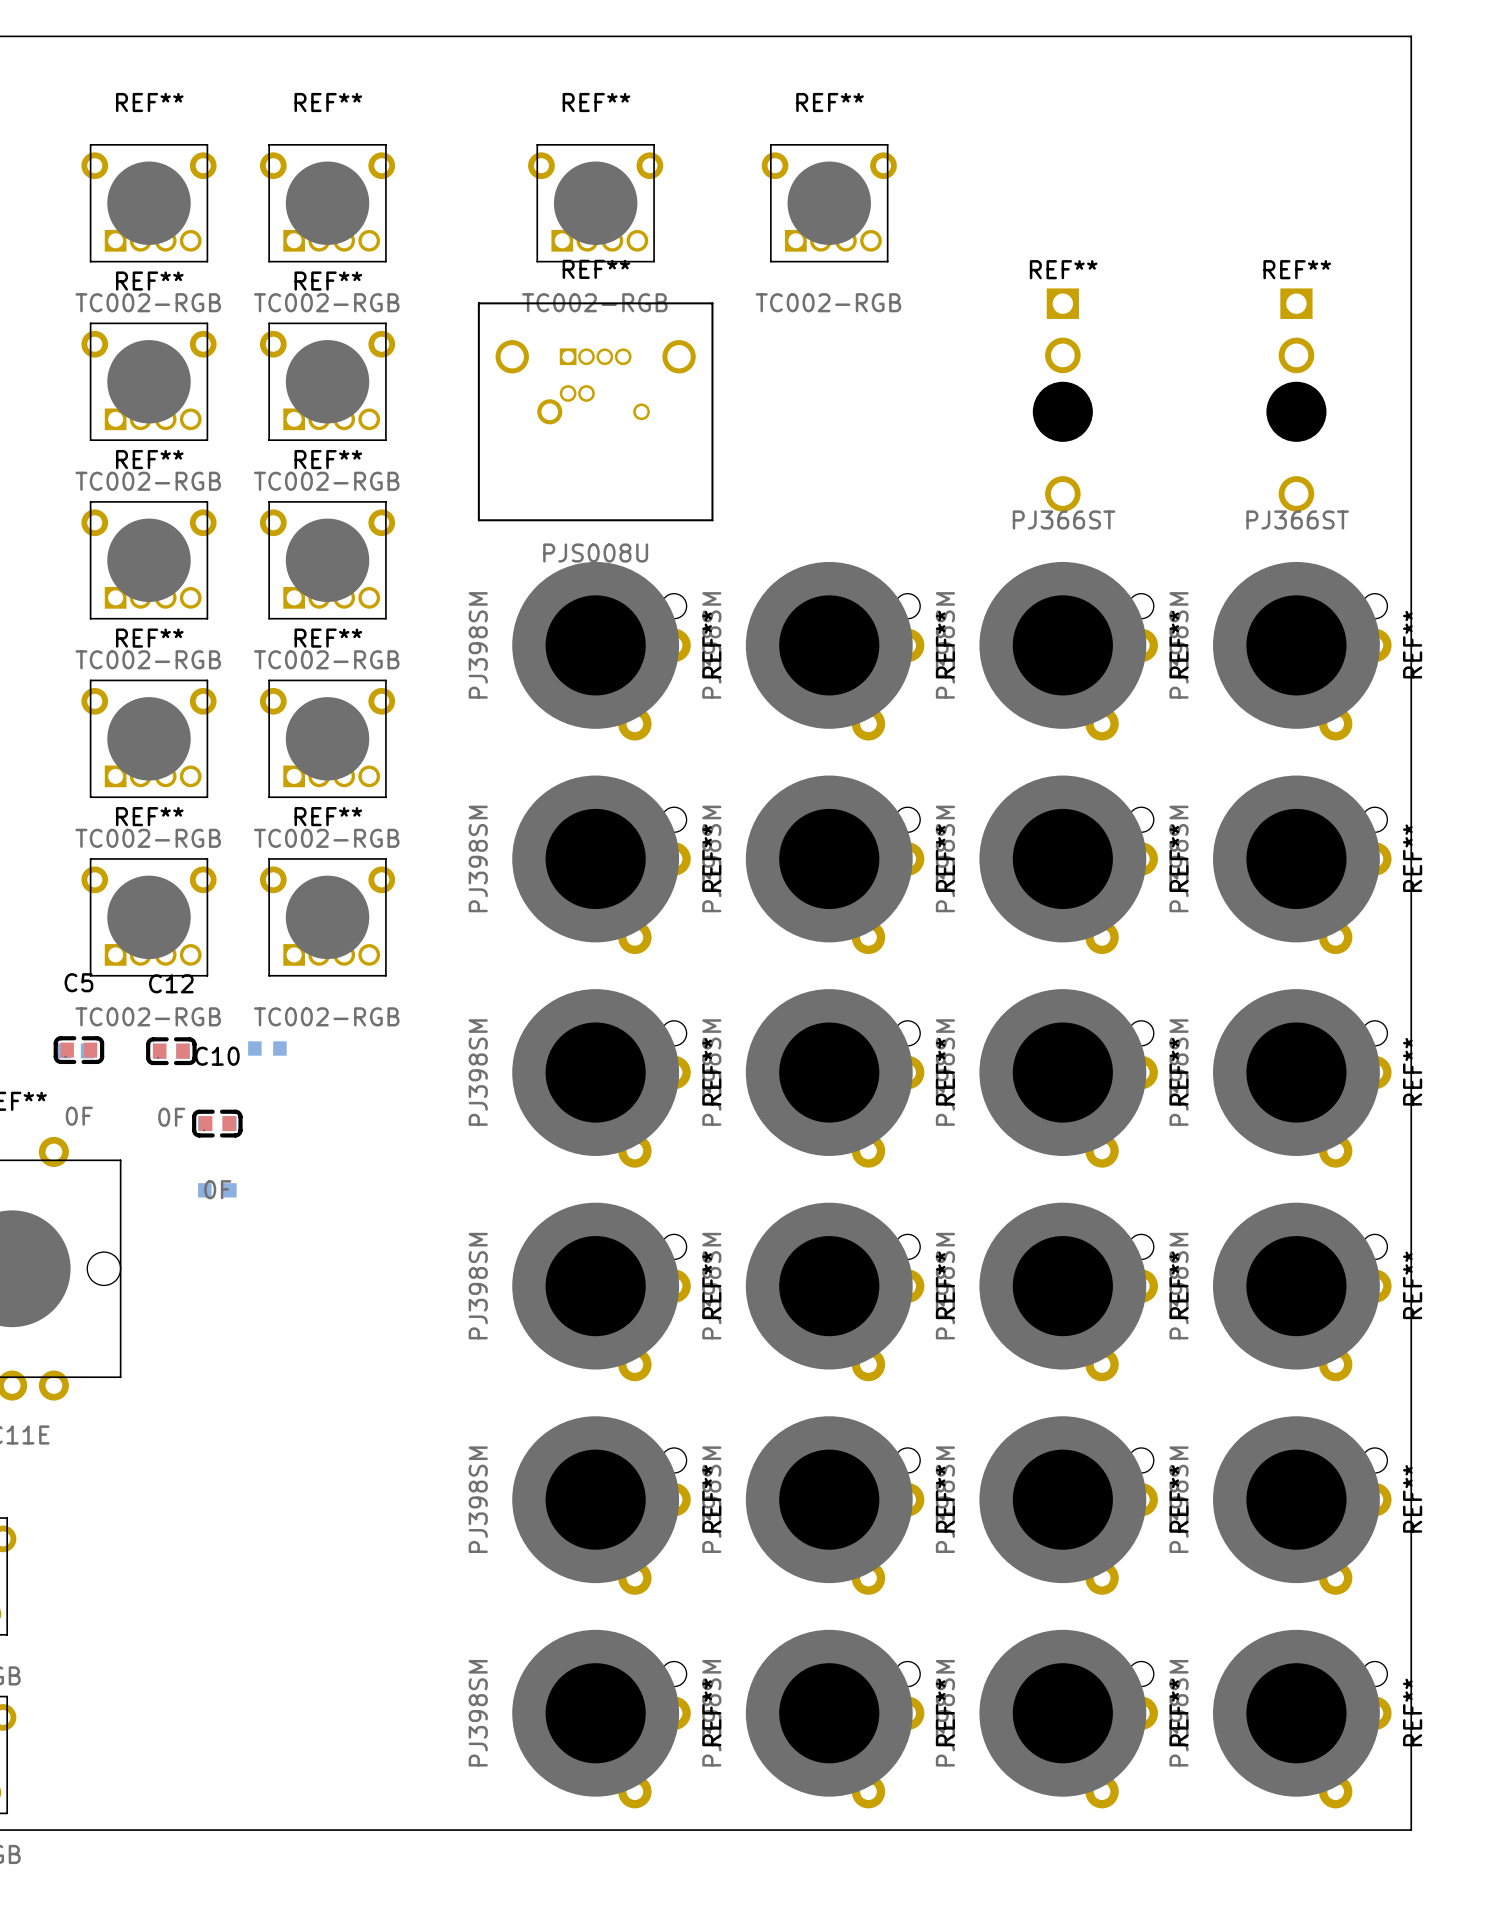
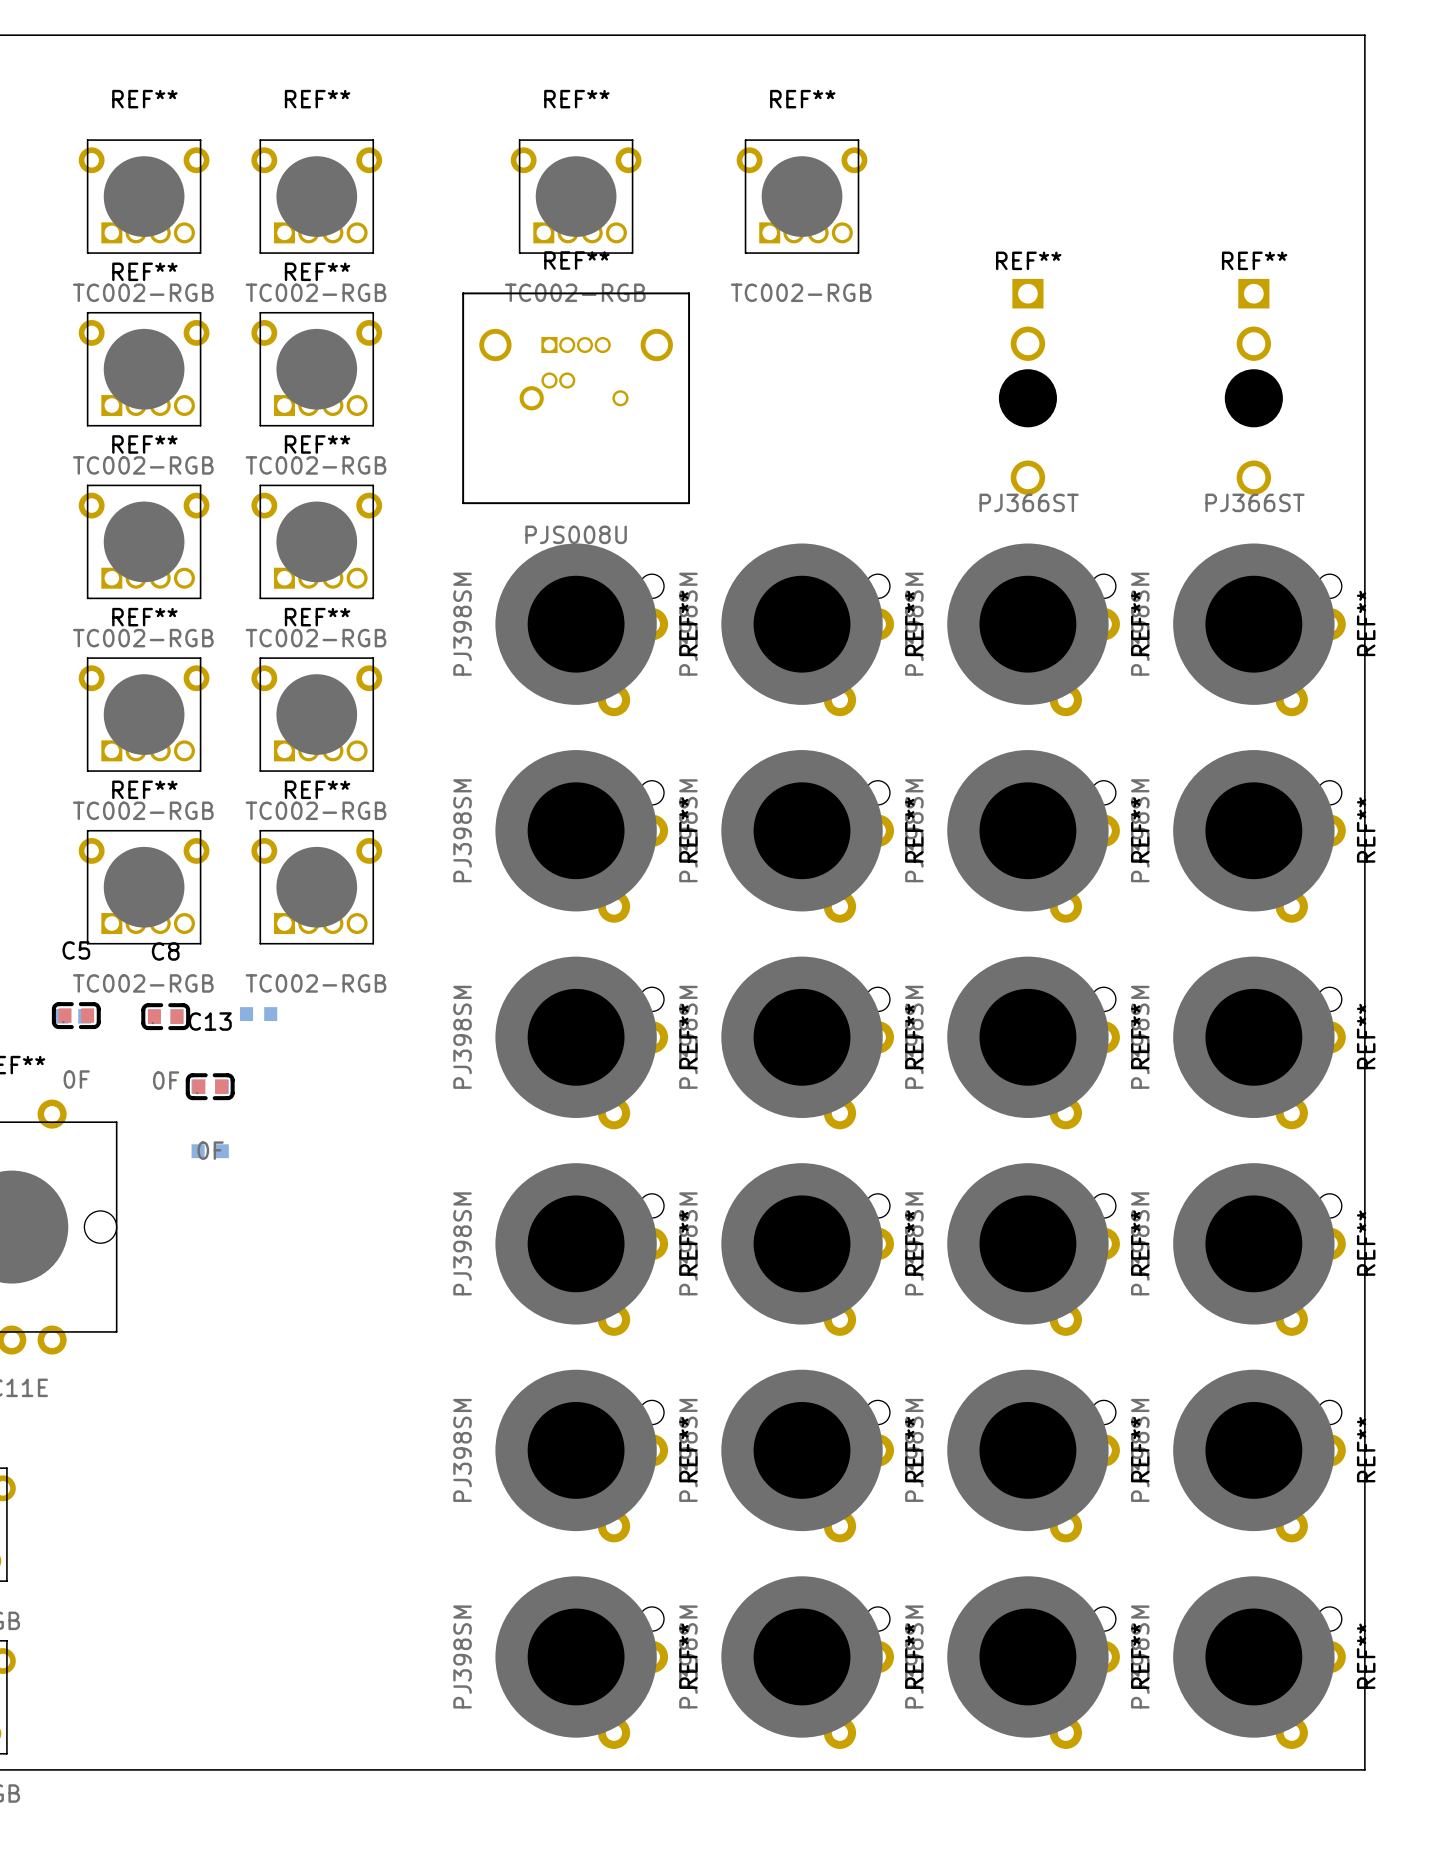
C12 name: C12 (171, 983) -> C8 (165, 951)
C10 name: C10 (217, 1056) -> C13 (210, 1021)

